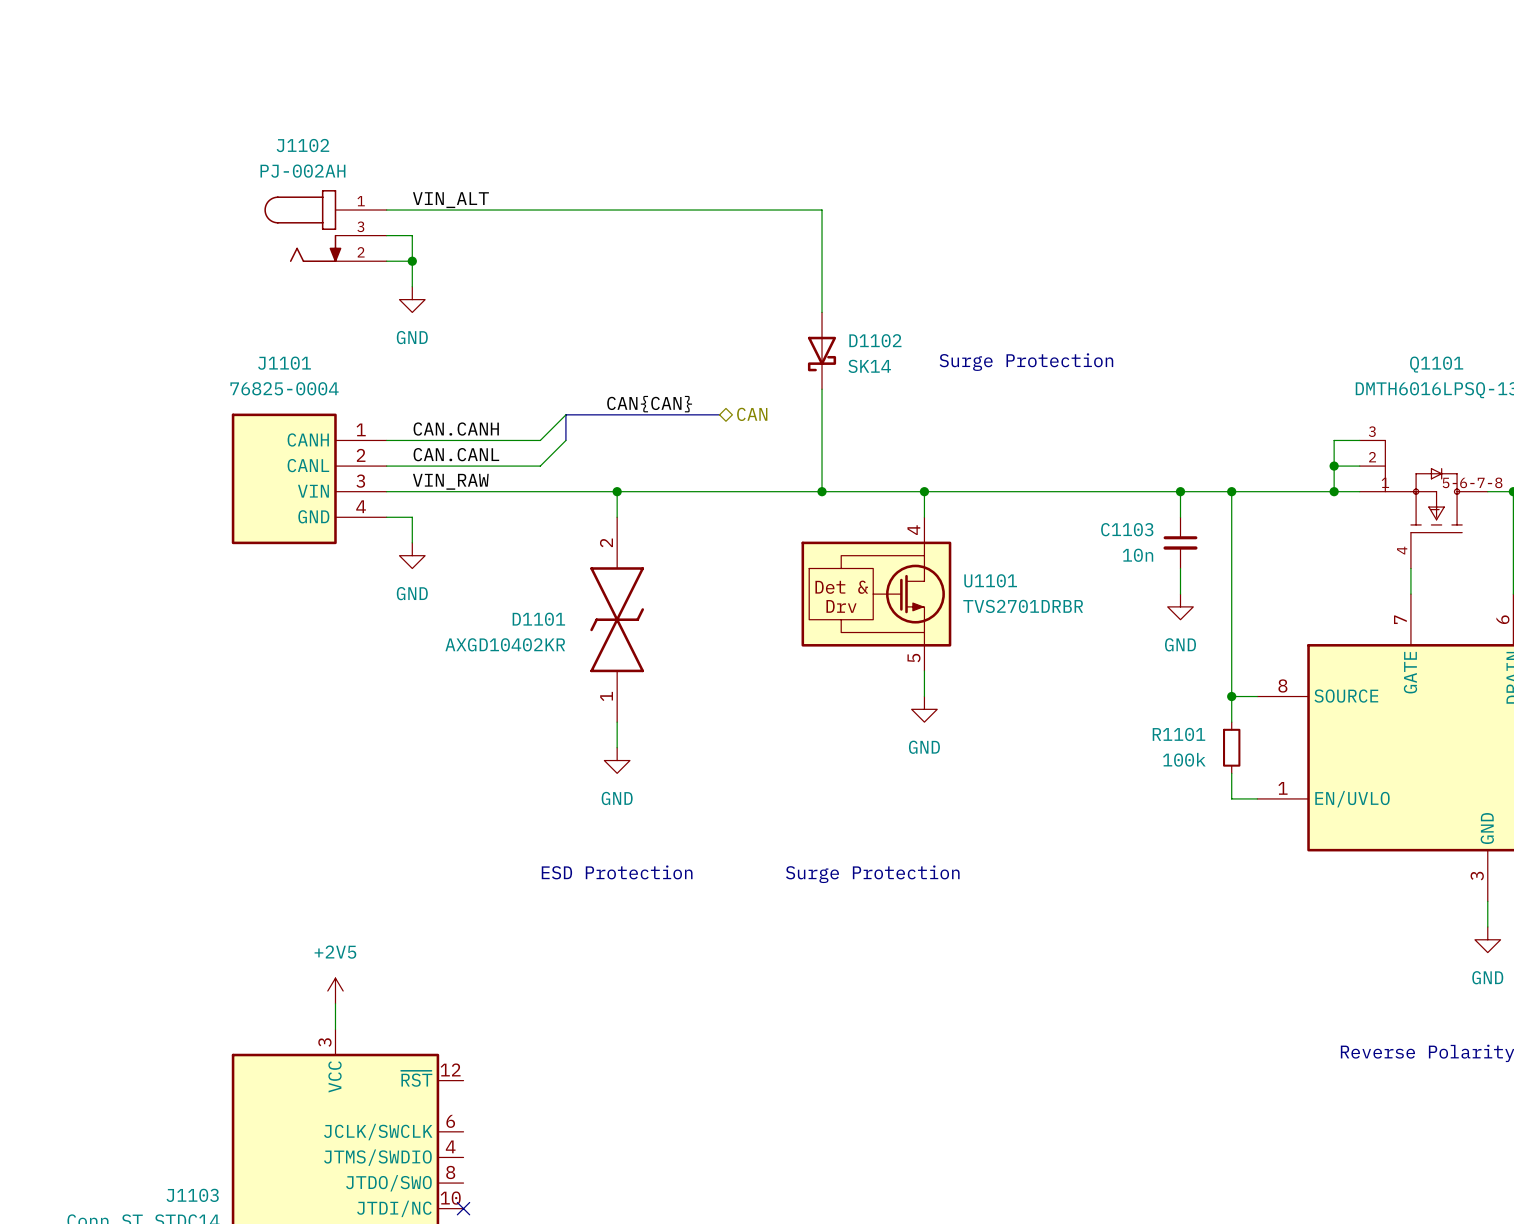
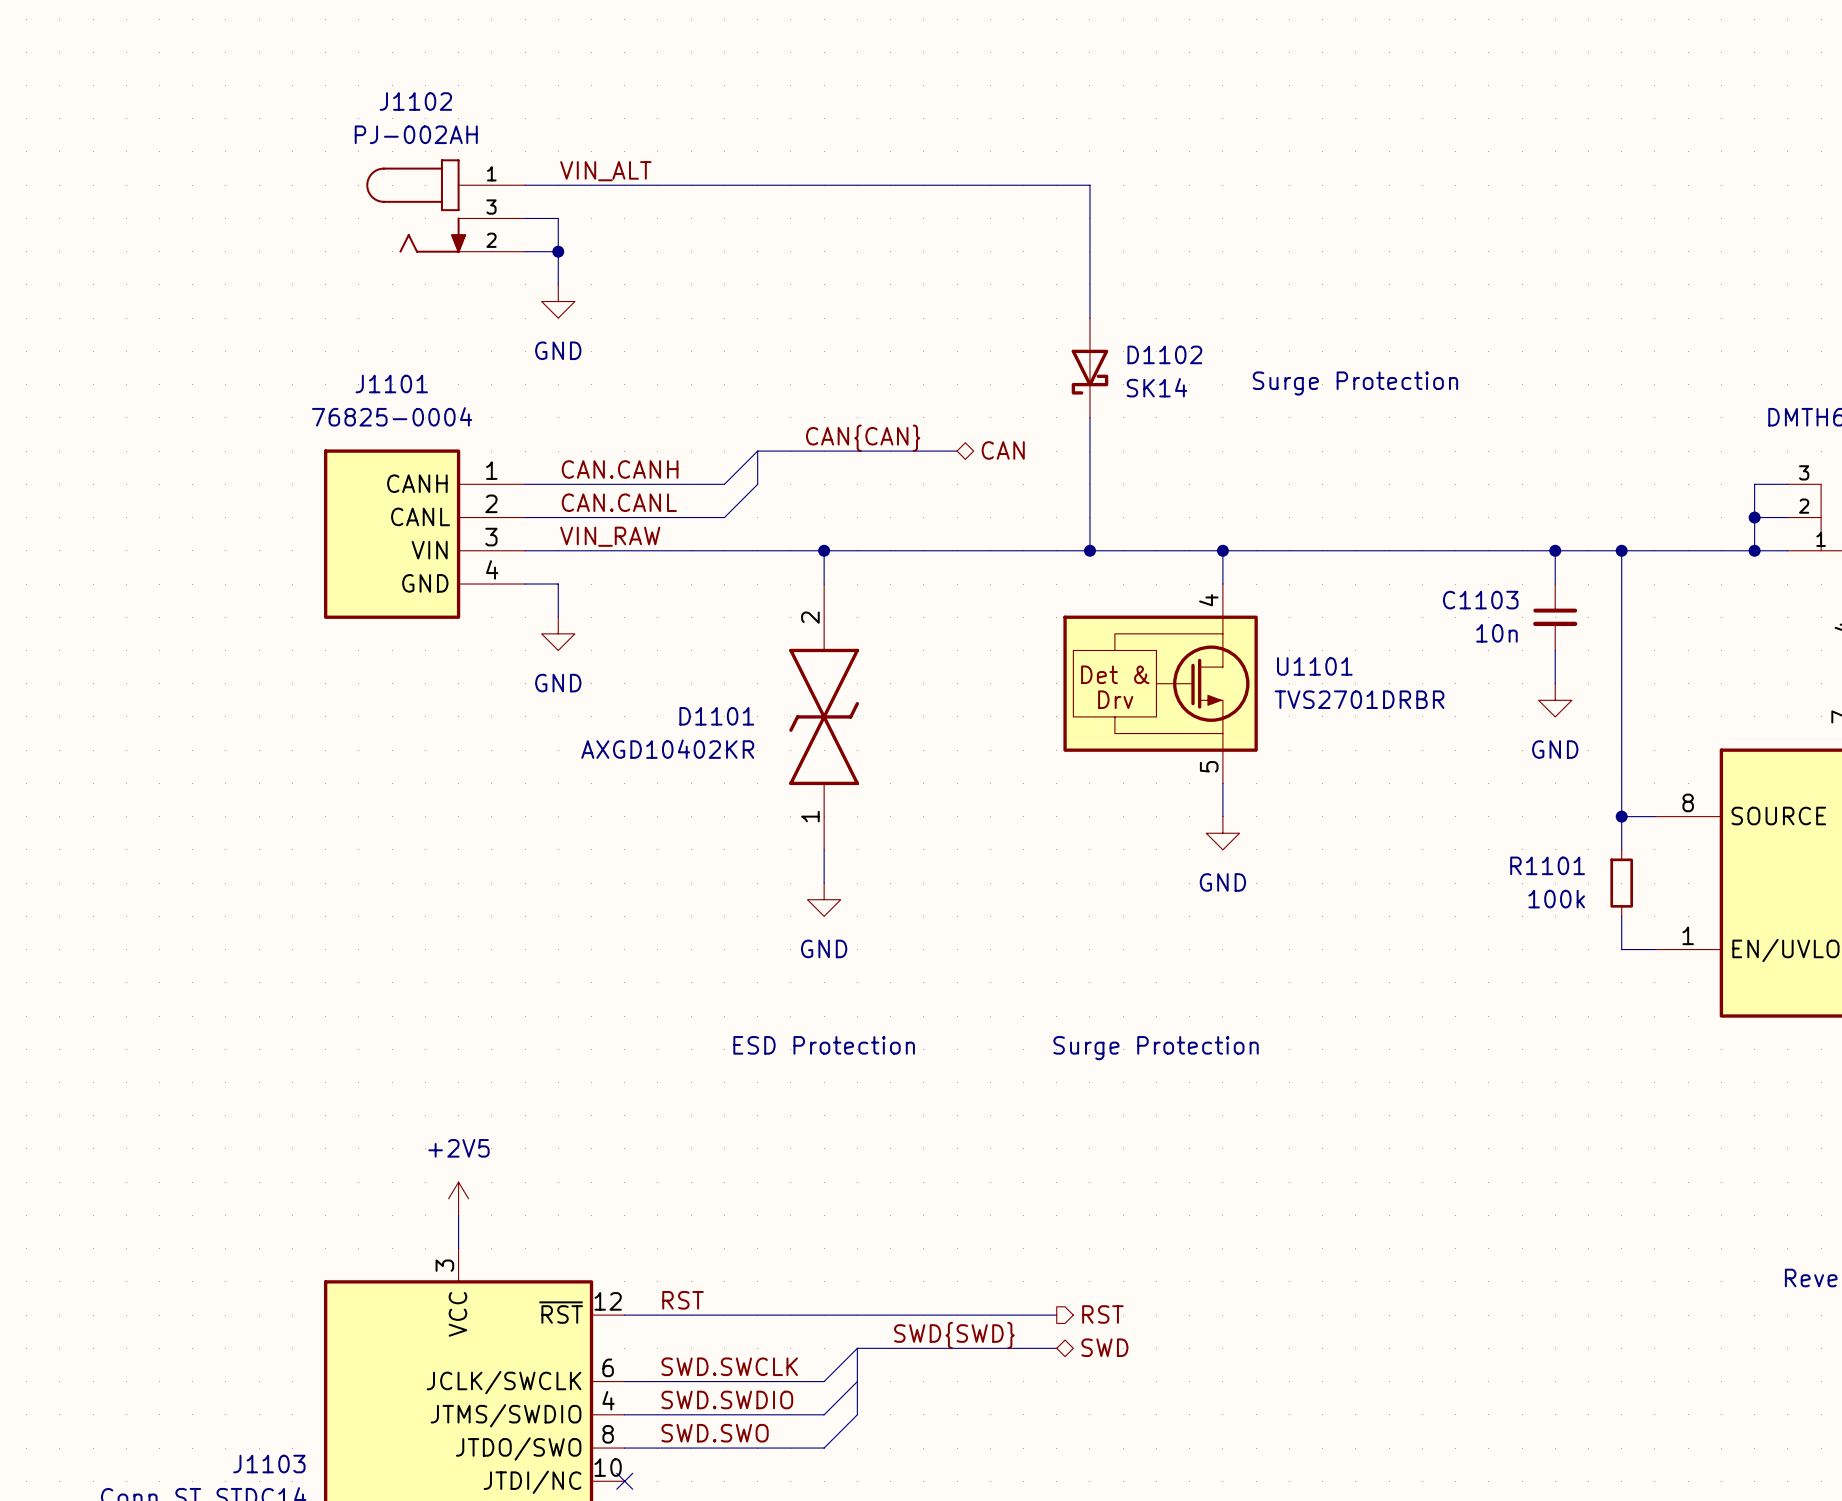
label: none -> RST (683, 1300)
wire: none -> (624, 1315) (1056, 1315)
hierarchical label: none -> RST (1102, 1314)
label: none -> SWD{SWD} (954, 1335)
hierarchical label: none -> SWD (1104, 1347)
wire: none -> (857, 1348) (824, 1381) (624, 1381)
bus: none -> (1056, 1348) (857, 1348) (857, 1414)
label: none -> SWD.SWCLK (729, 1366)
wire: none -> (857, 1381) (824, 1414) (624, 1414)
label: none -> SWD.SWDIO (727, 1399)
wire: none -> (857, 1414) (824, 1448) (624, 1448)
label: none -> SWD.SWO (715, 1433)

